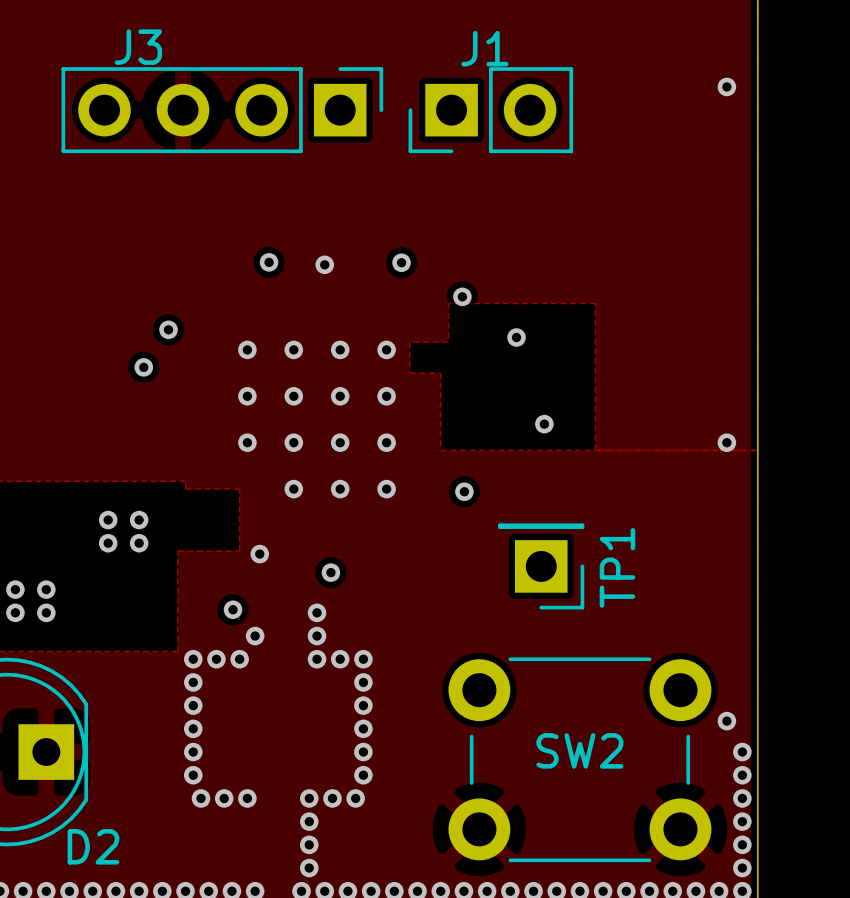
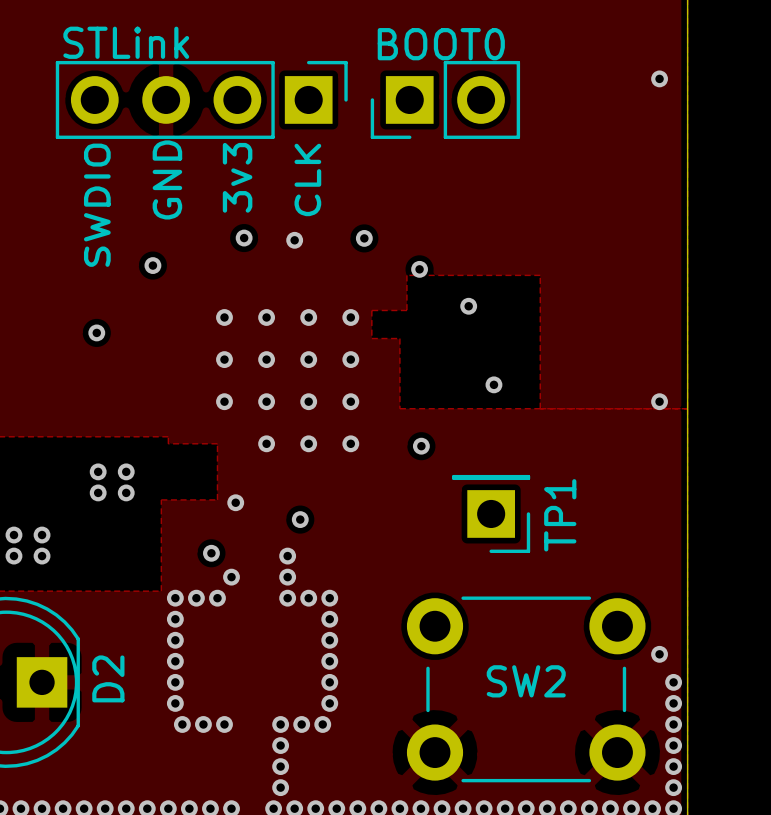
J3 name: J3 (138, 47) -> STLink (126, 42)
J1 name: J1 (484, 48) -> BOOT0 (441, 44)
text: none -> 3v3 (237, 177)
text: none -> GND (167, 179)
text: none -> CLK (307, 179)
text: none -> SWDIO (97, 205)
via: none -> (152, 265)
via: (168, 329) -> none
via: none -> (96, 332)
via: (143, 367) -> none
D2 name rotation: 0° (93, 846) -> 90° counterclockwise (108, 678)
D2 name position: D2 (93, 846) -> D2 (108, 678)

